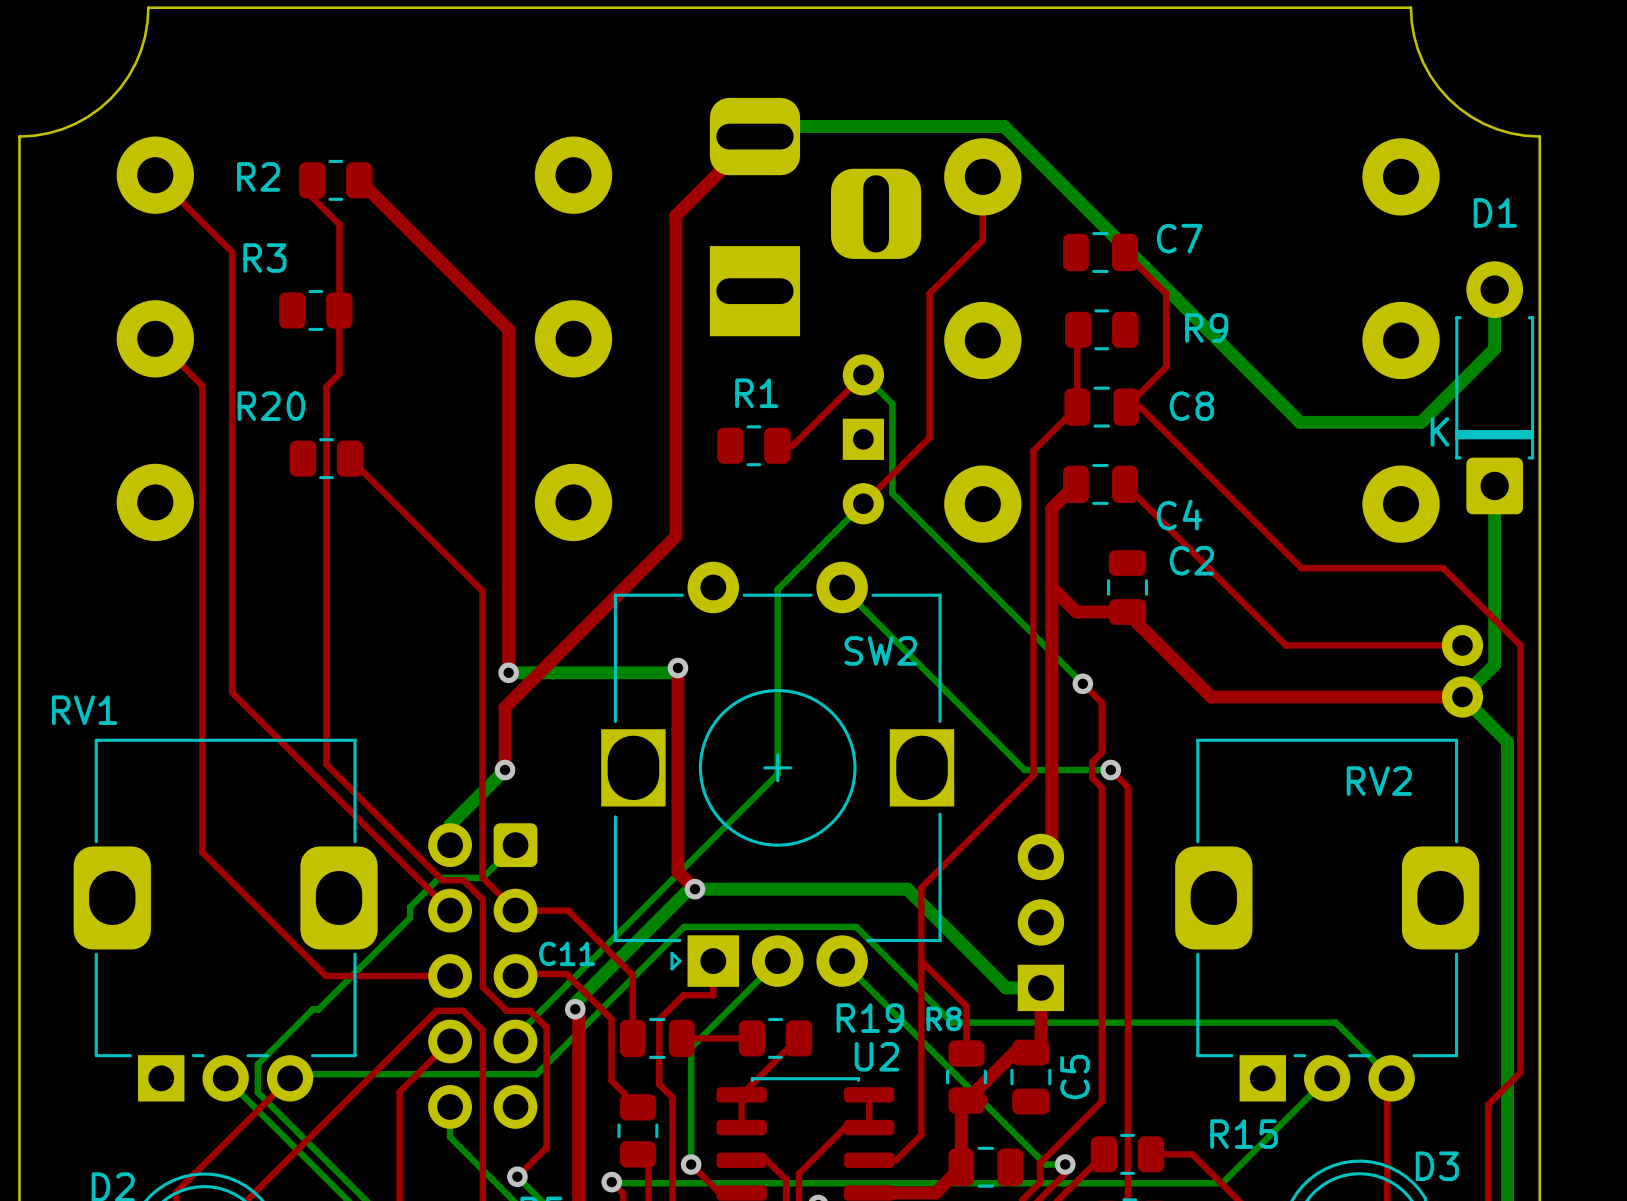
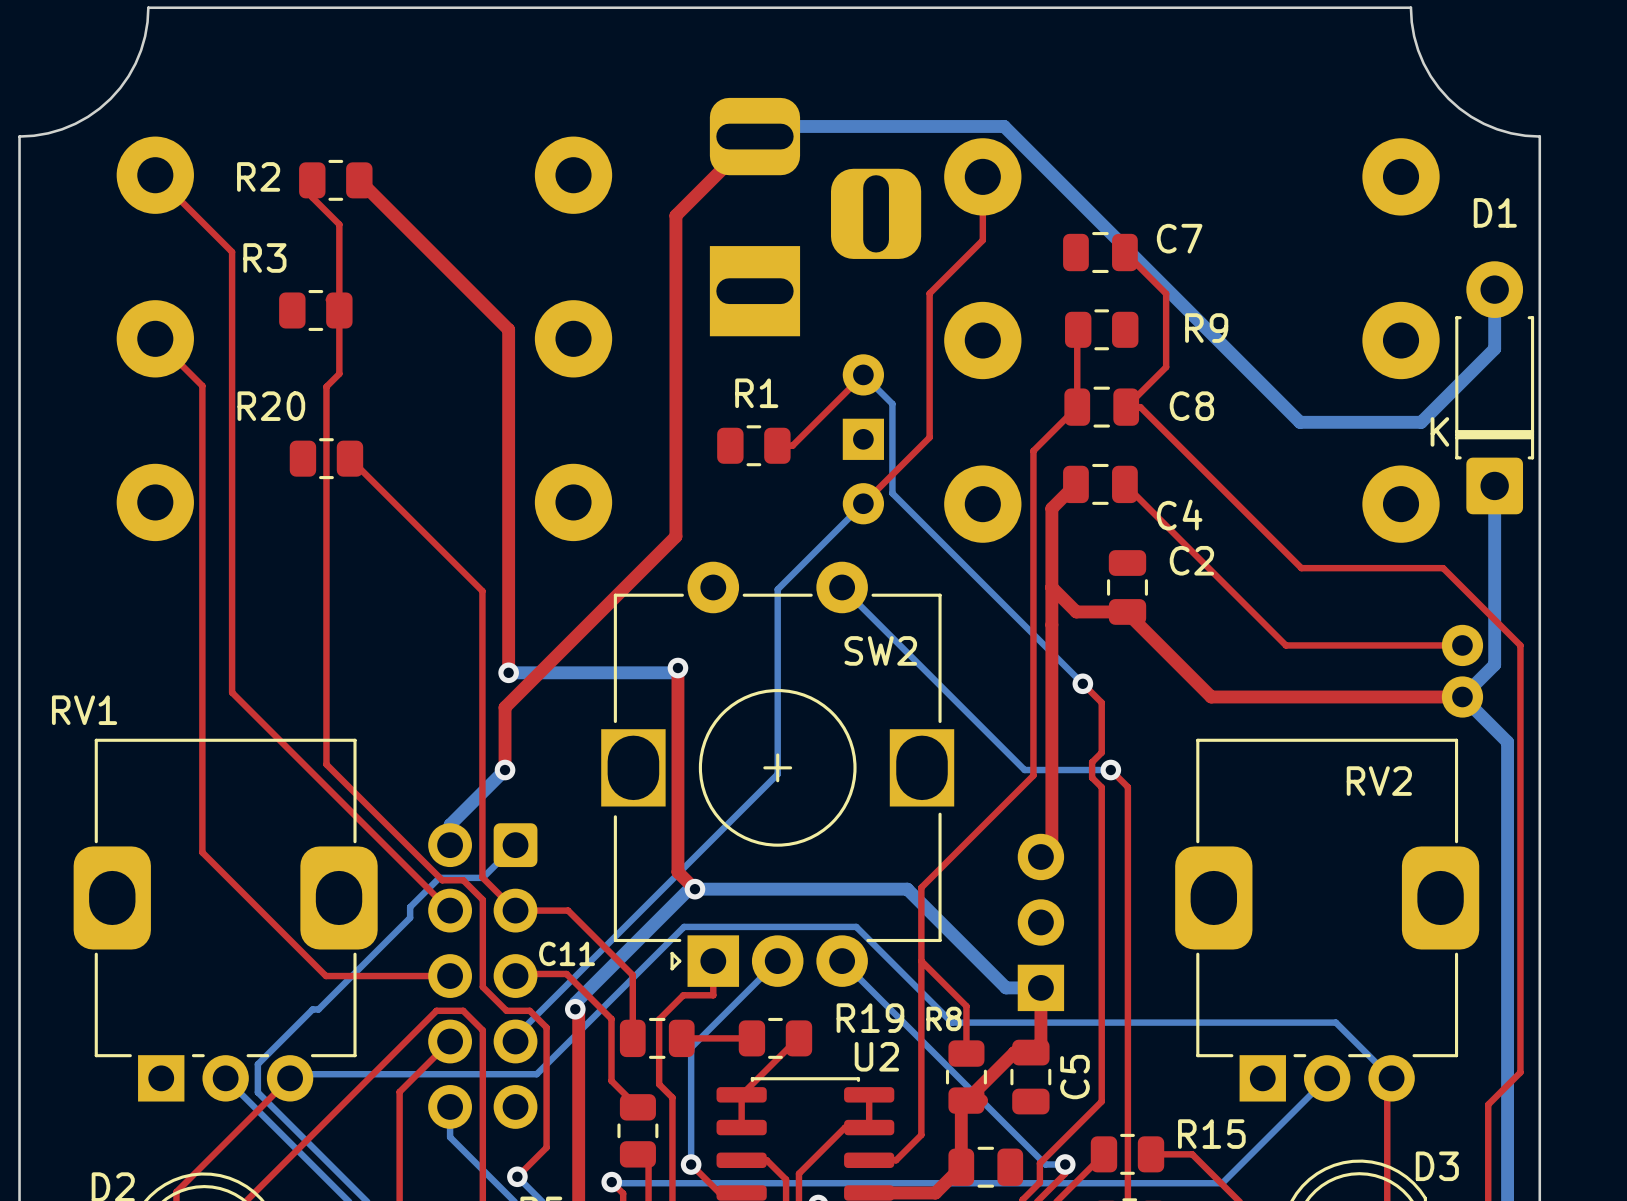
R15 name position: R15 (1244, 1134) -> R15 (1211, 1134)

